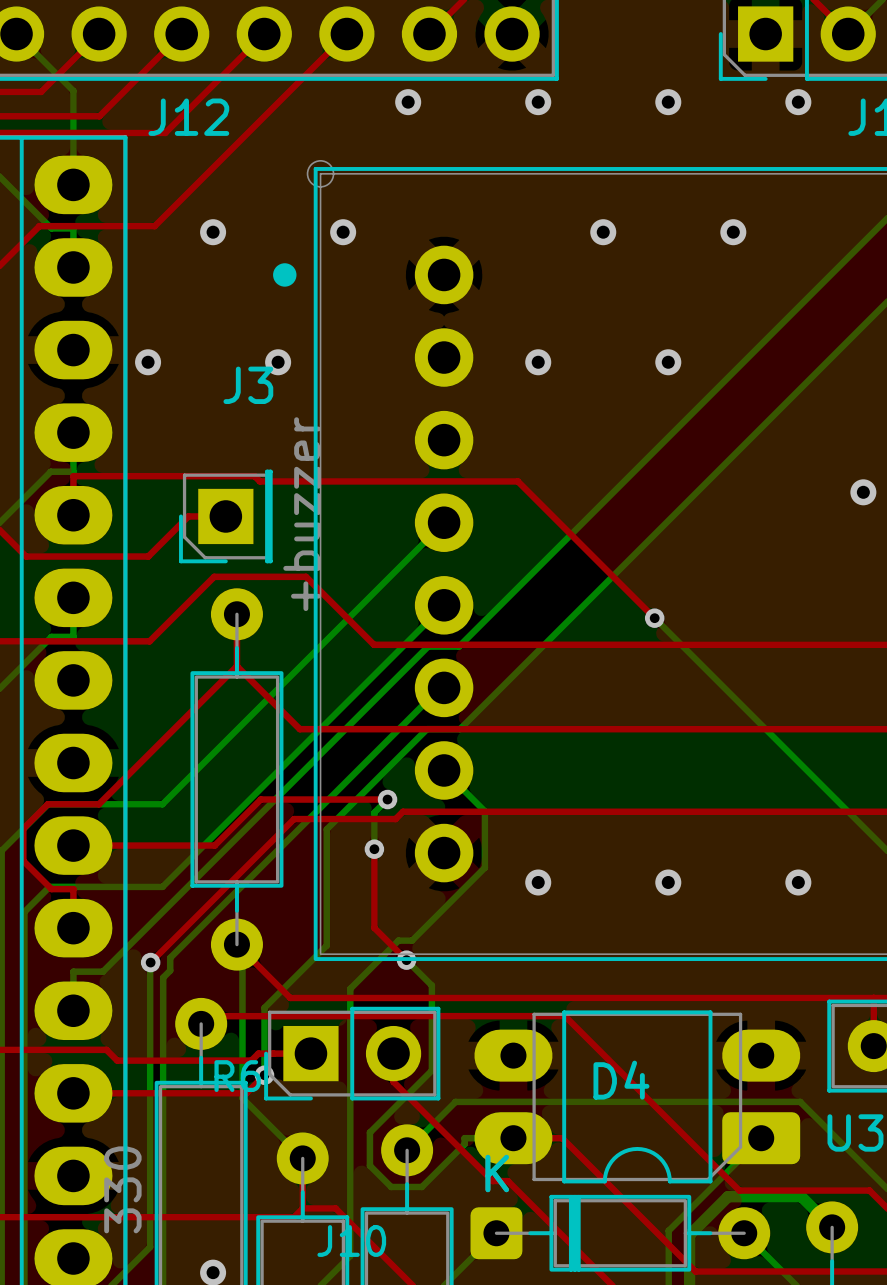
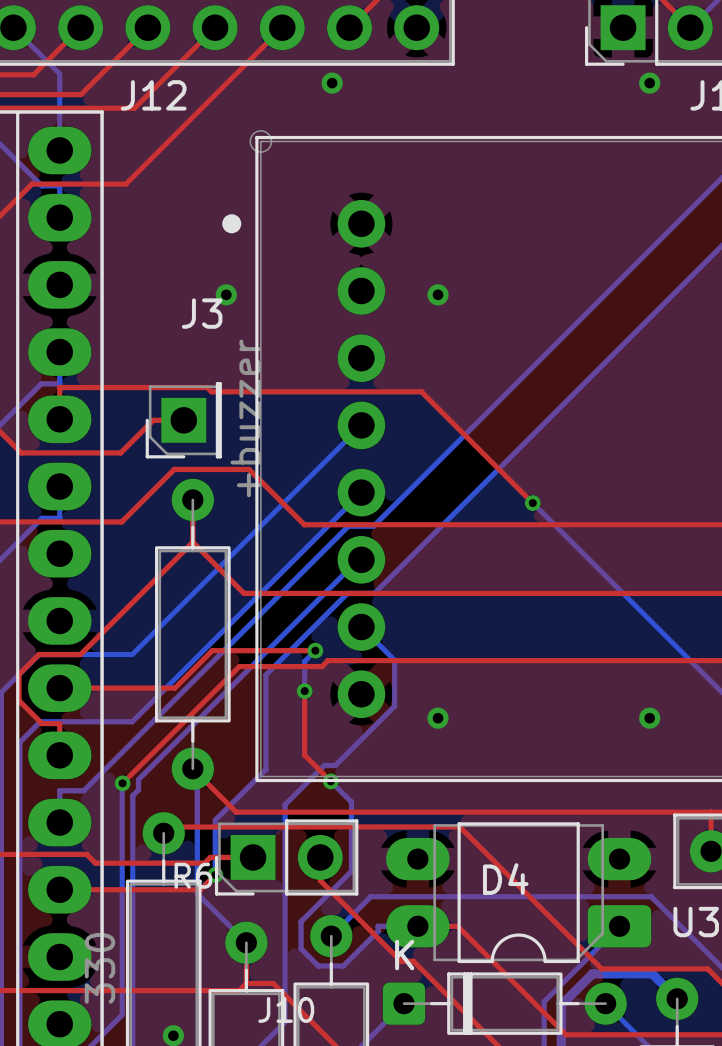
via: (538, 102) -> none
via: (668, 102) -> none
via: (213, 232) -> none
via: (343, 232) -> none
via: (603, 232) -> none
via: (733, 232) -> none
via: (148, 362) -> none
via: (668, 362) -> none
via: (863, 492) -> none
via: (668, 882) -> none

